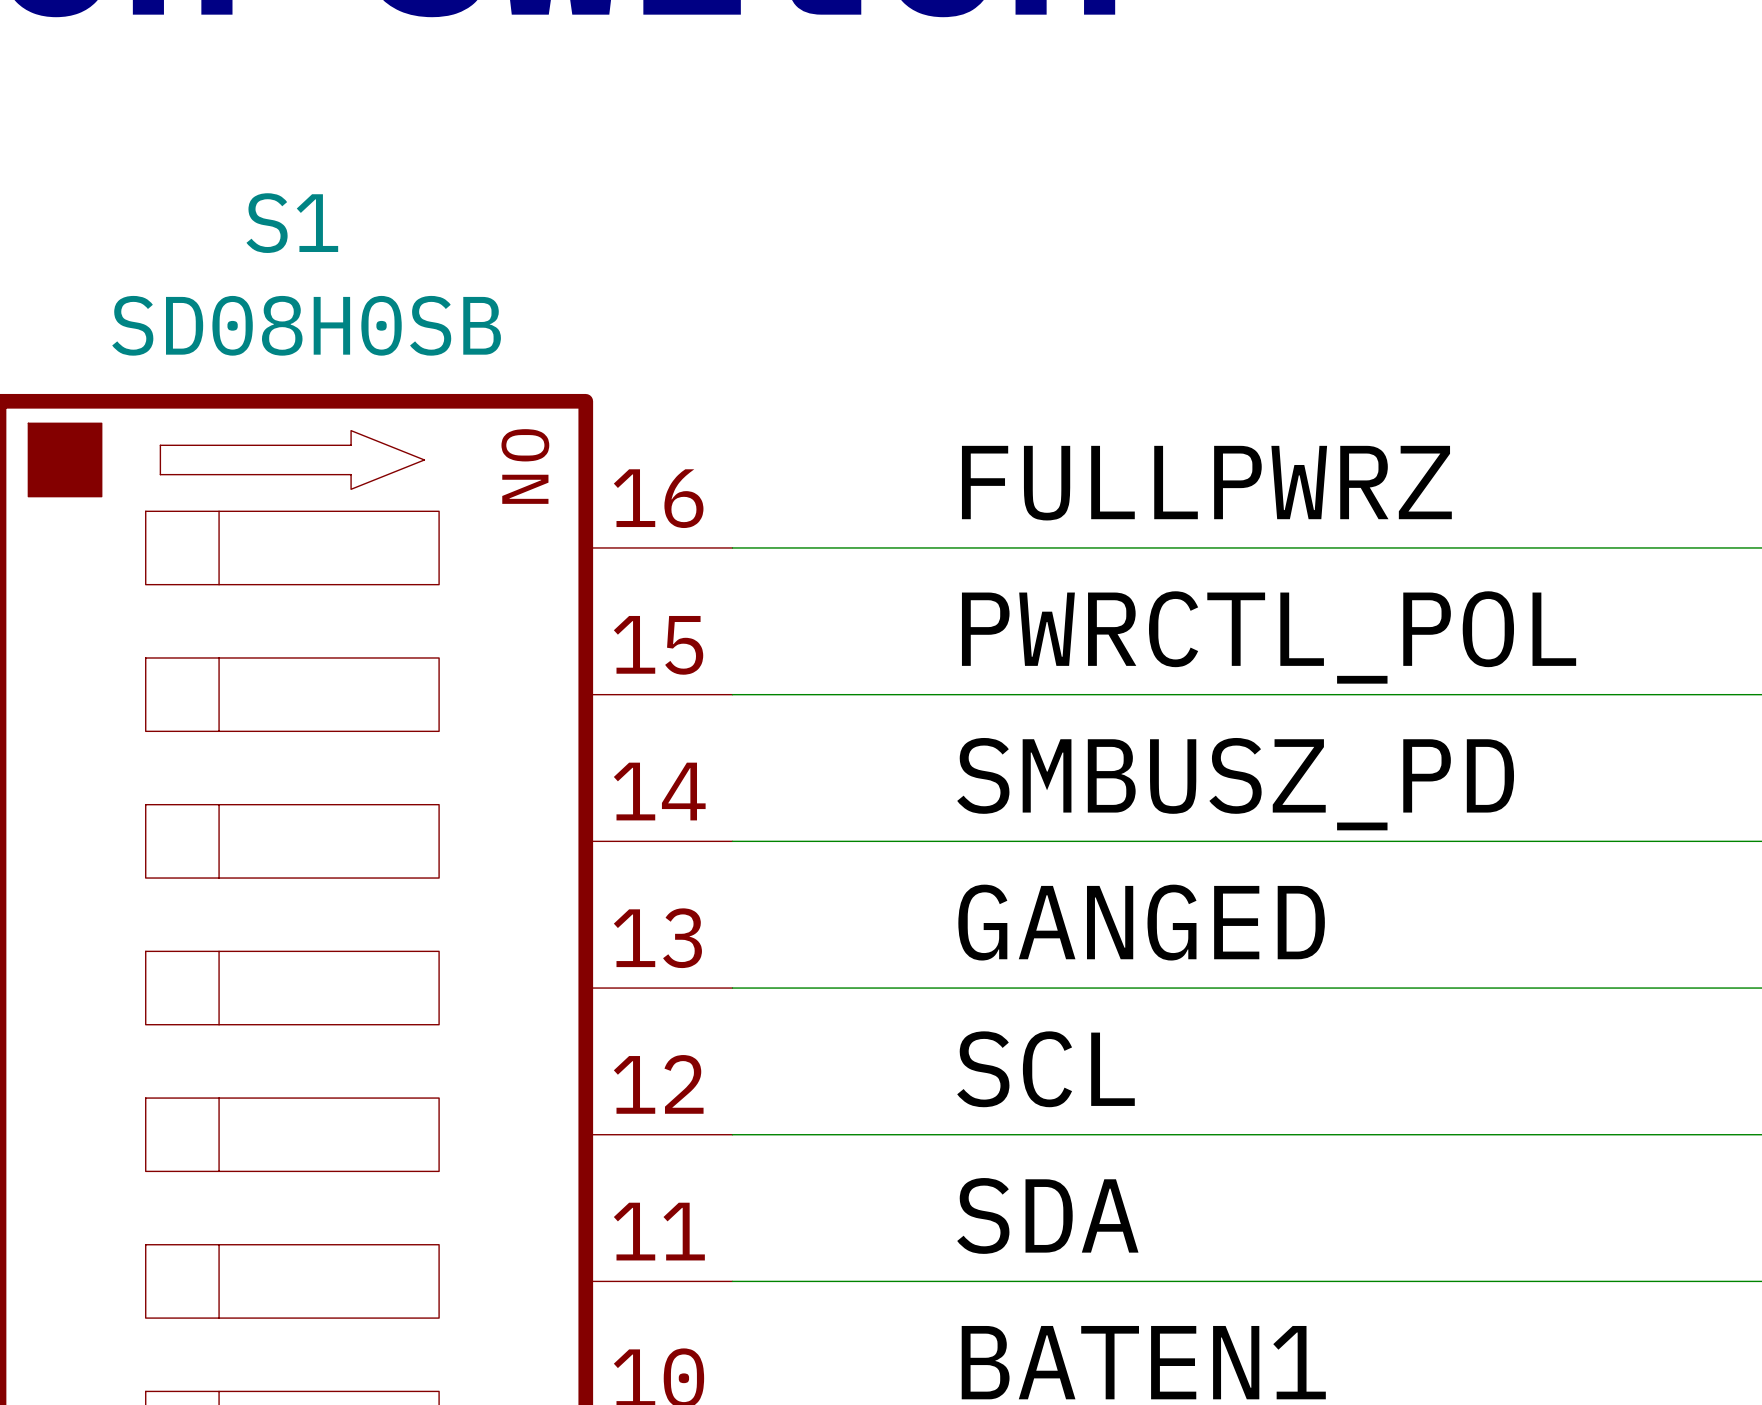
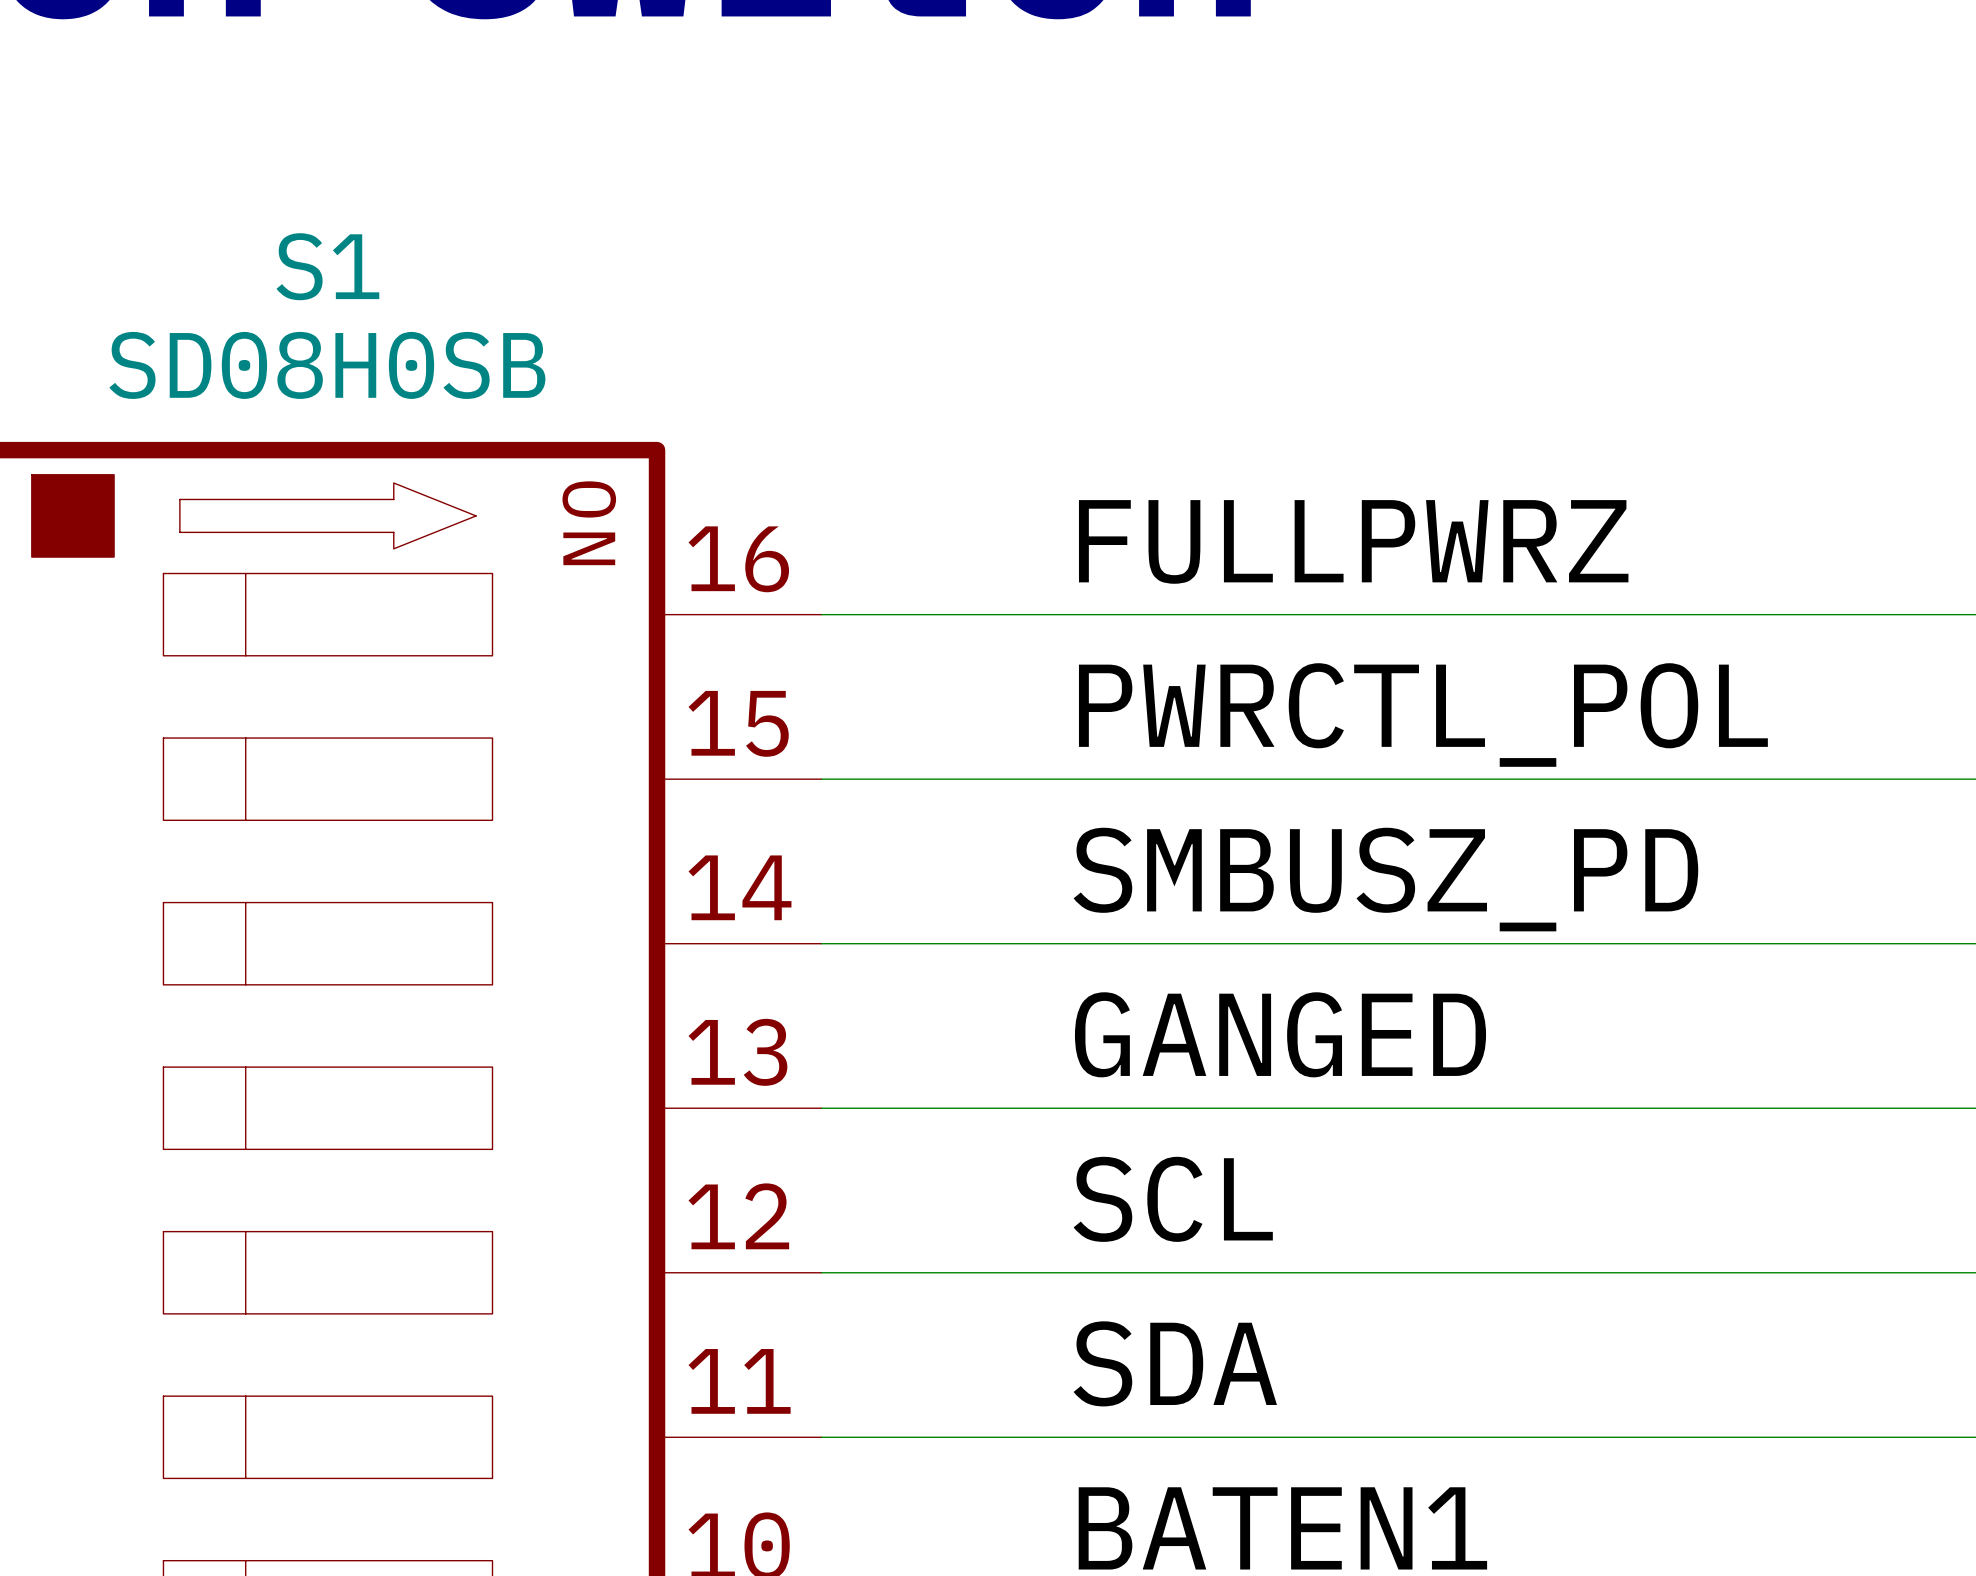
S1 name position: S1 (292, 223) -> S1 (327, 266)
S1 text position: SD08H0SB (306, 325) -> SD08H0SB (327, 365)

